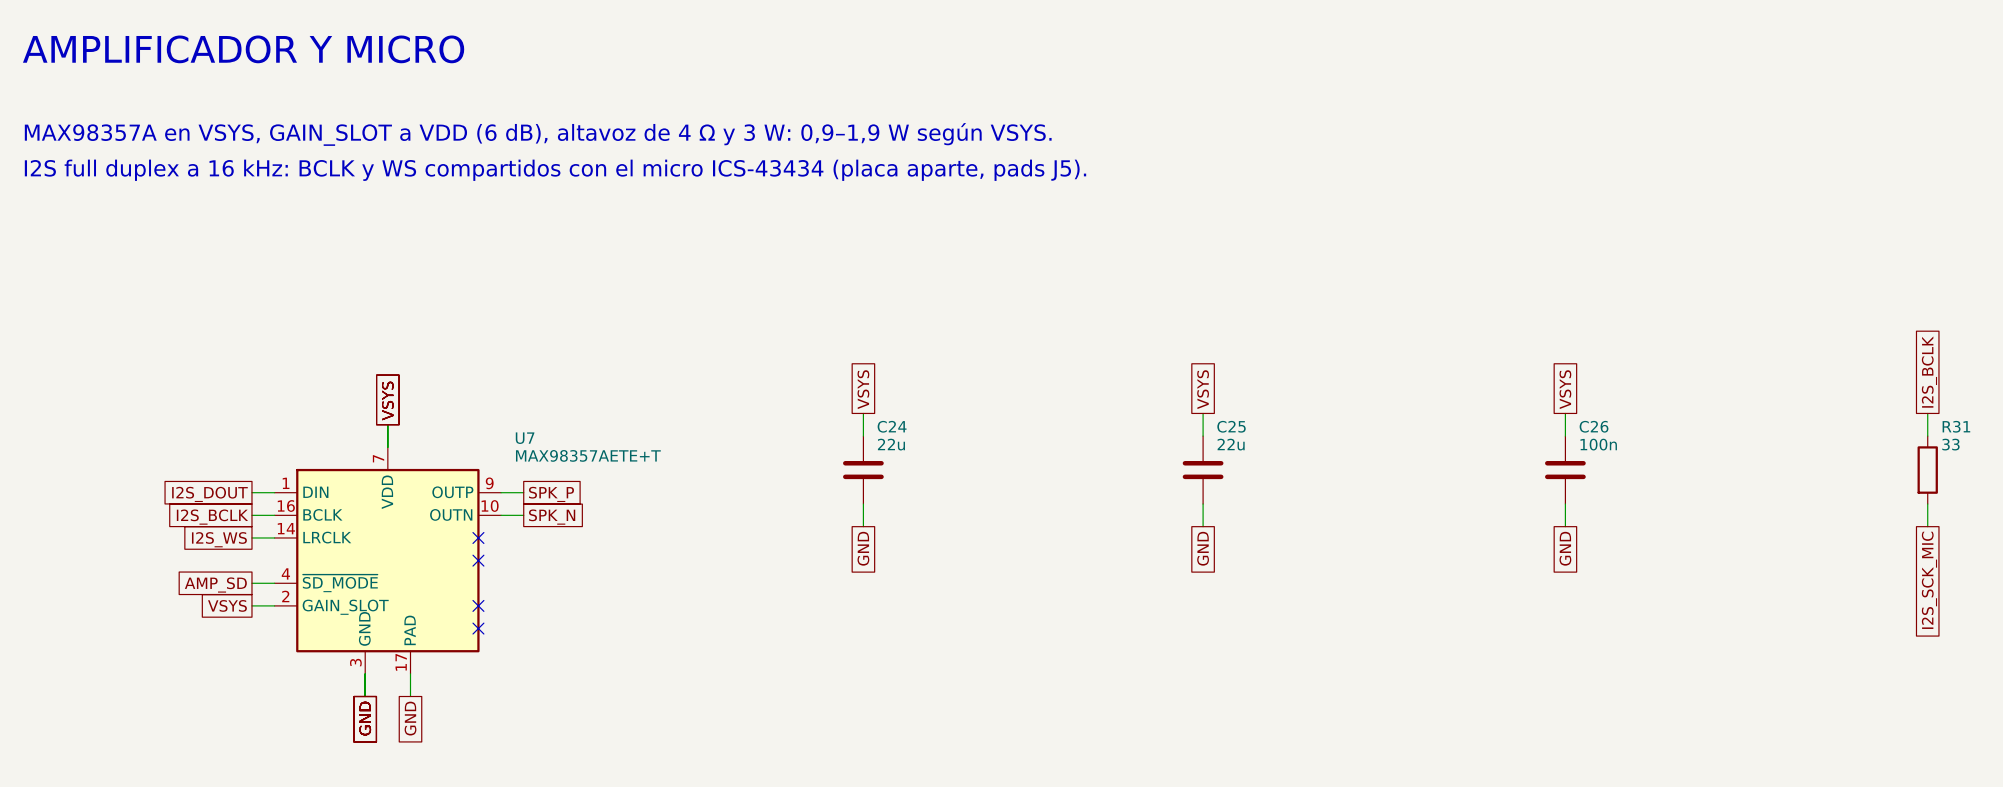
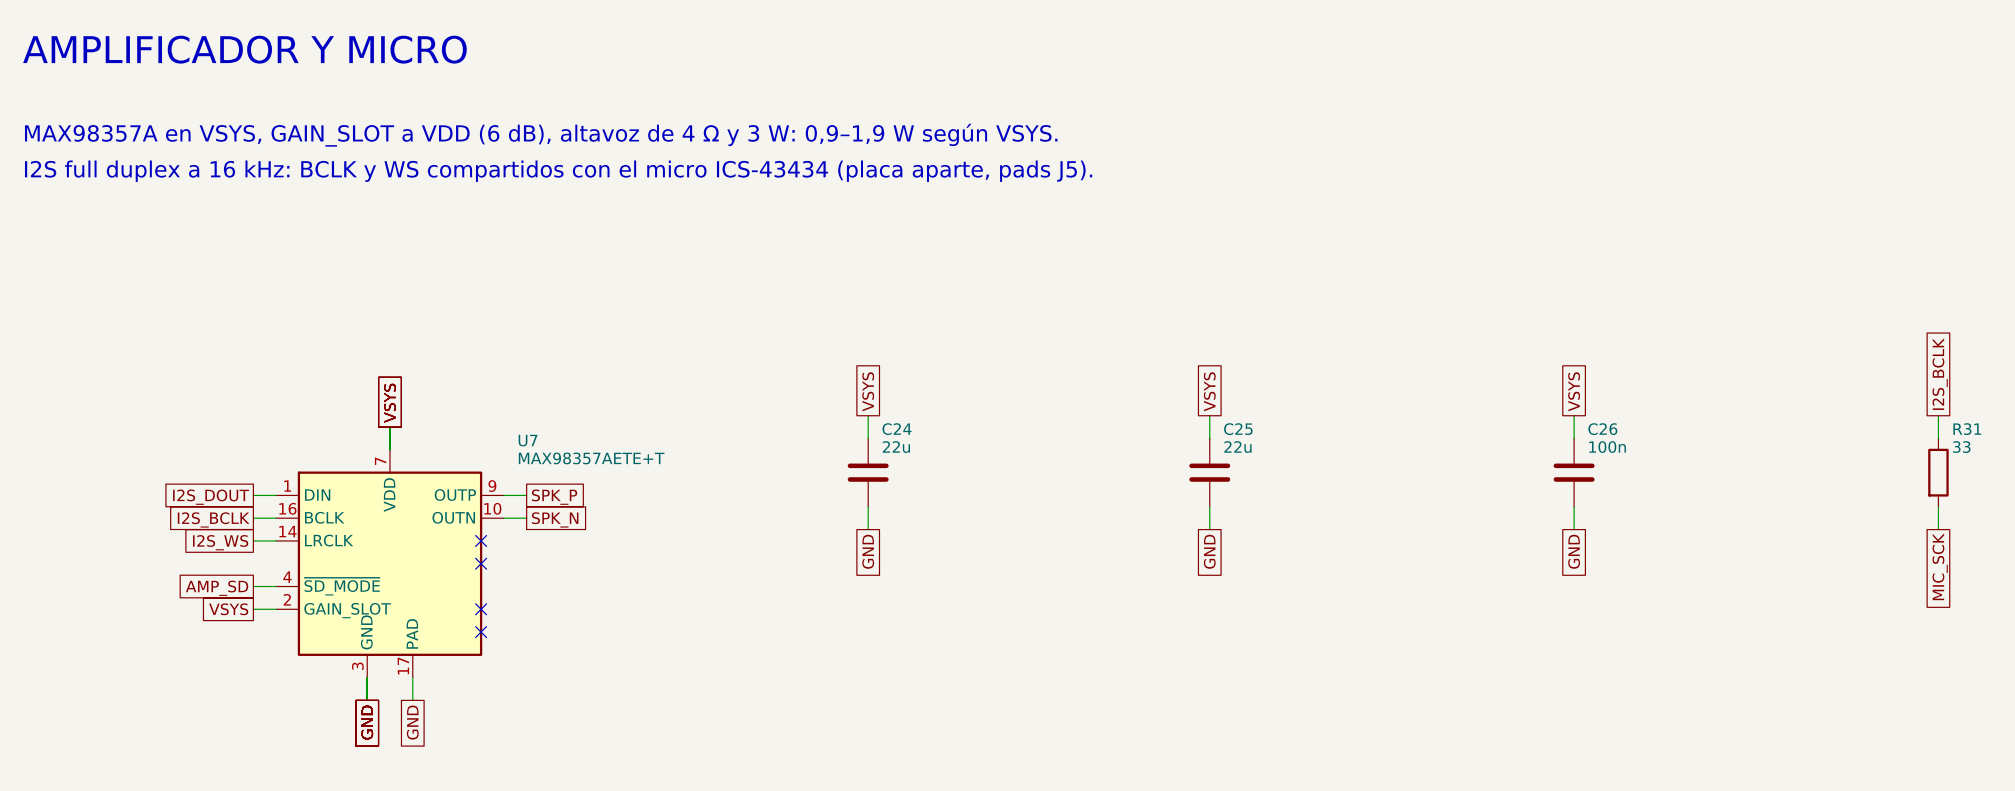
global label: I2S_SCK_MIC (1929, 580) -> MIC_SCK (1940, 566)

